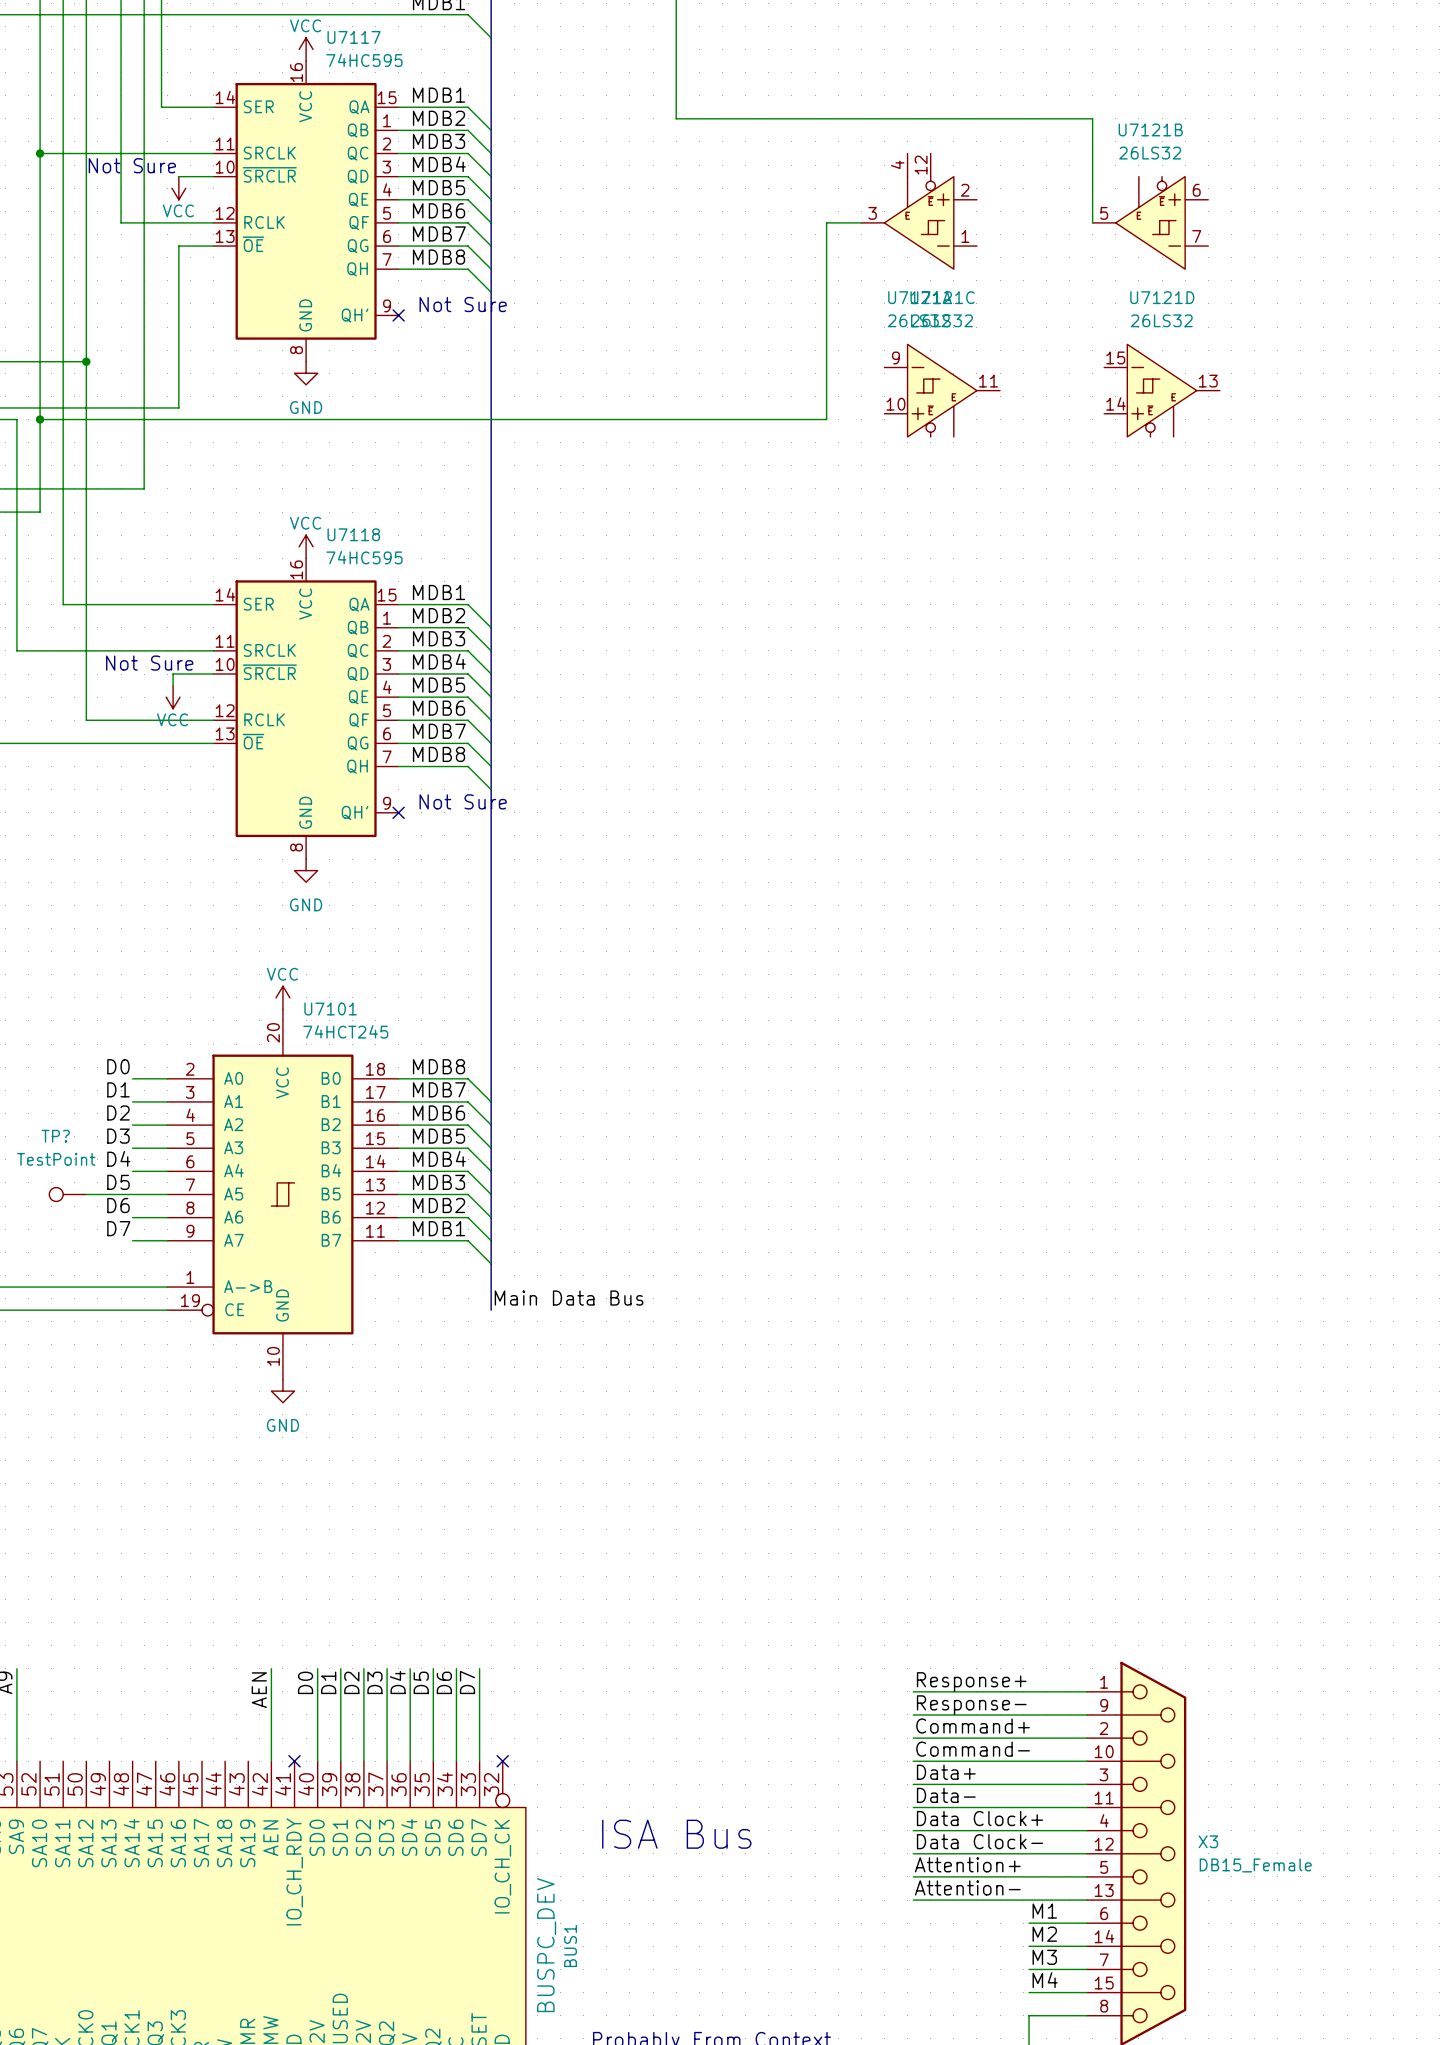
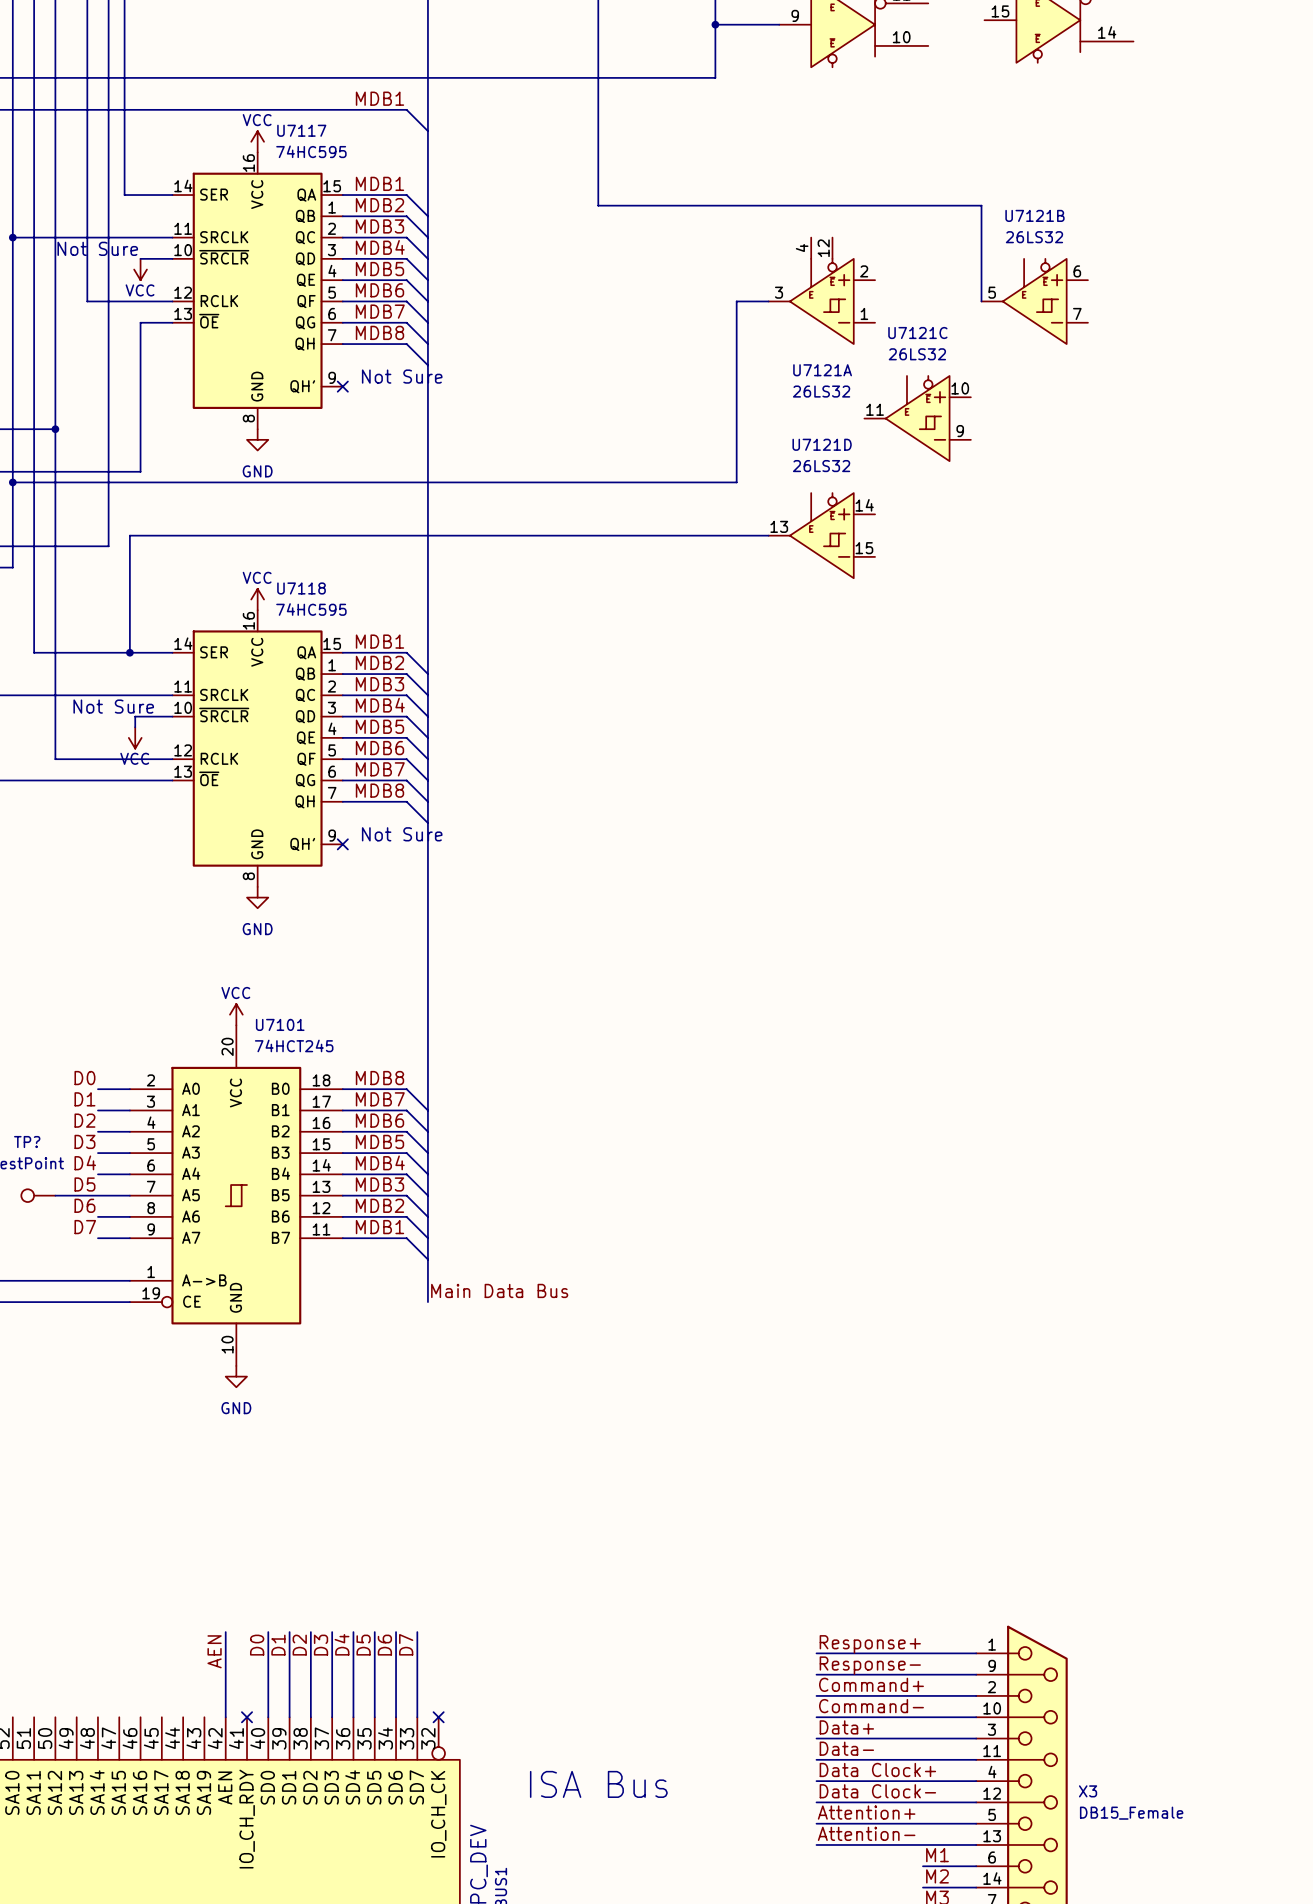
U7121C rotation: 0° (942, 390) -> 180° (917, 418)
U7121C position: (942, 390) -> (917, 418)
U7121D rotation: 0° (1162, 390) -> 180° (821, 535)
U7121D position: (1162, 390) -> (821, 535)
wire: none -> (768, 535) (129, 535) (129, 652)
junction: none -> (129, 652)

